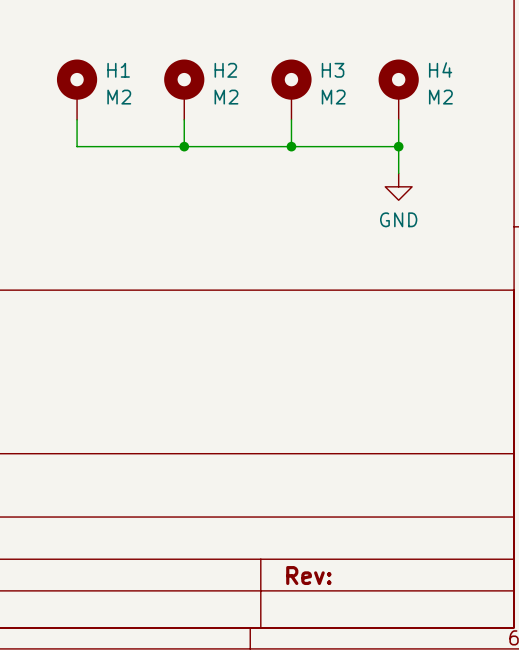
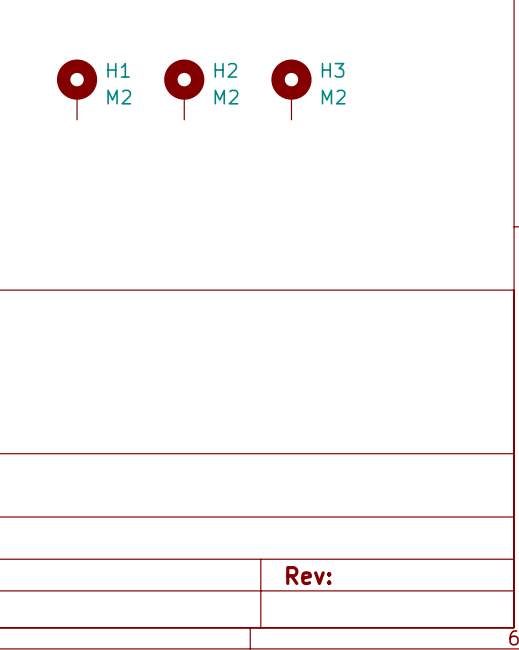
H4: M2 (398, 89) -> none
wire: (77, 119) (77, 146) (398, 146) -> none
wire: (184, 119) (184, 146) -> none
wire: (291, 119) (291, 146) -> none
wire: (398, 119) (398, 173) -> none
junction: (184, 146) -> none
junction: (291, 146) -> none
junction: (398, 146) -> none
power symbol: GND (398, 186) -> none

